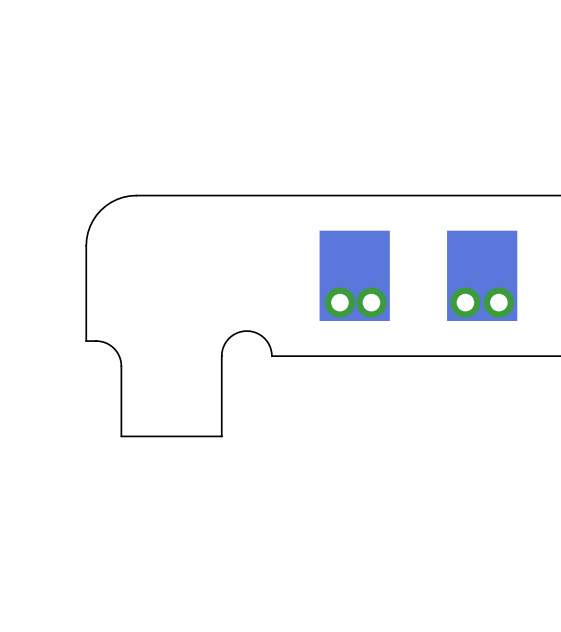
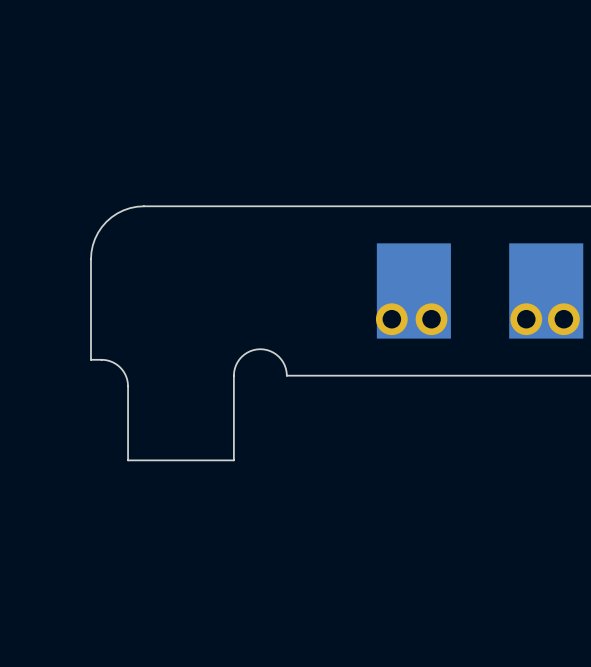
part position: (354, 275) -> (413, 290)
part position: (482, 275) -> (546, 290)
part: (339, 302) -> none
part: none -> (431, 319)
part: (465, 302) -> none
part: none -> (563, 319)

